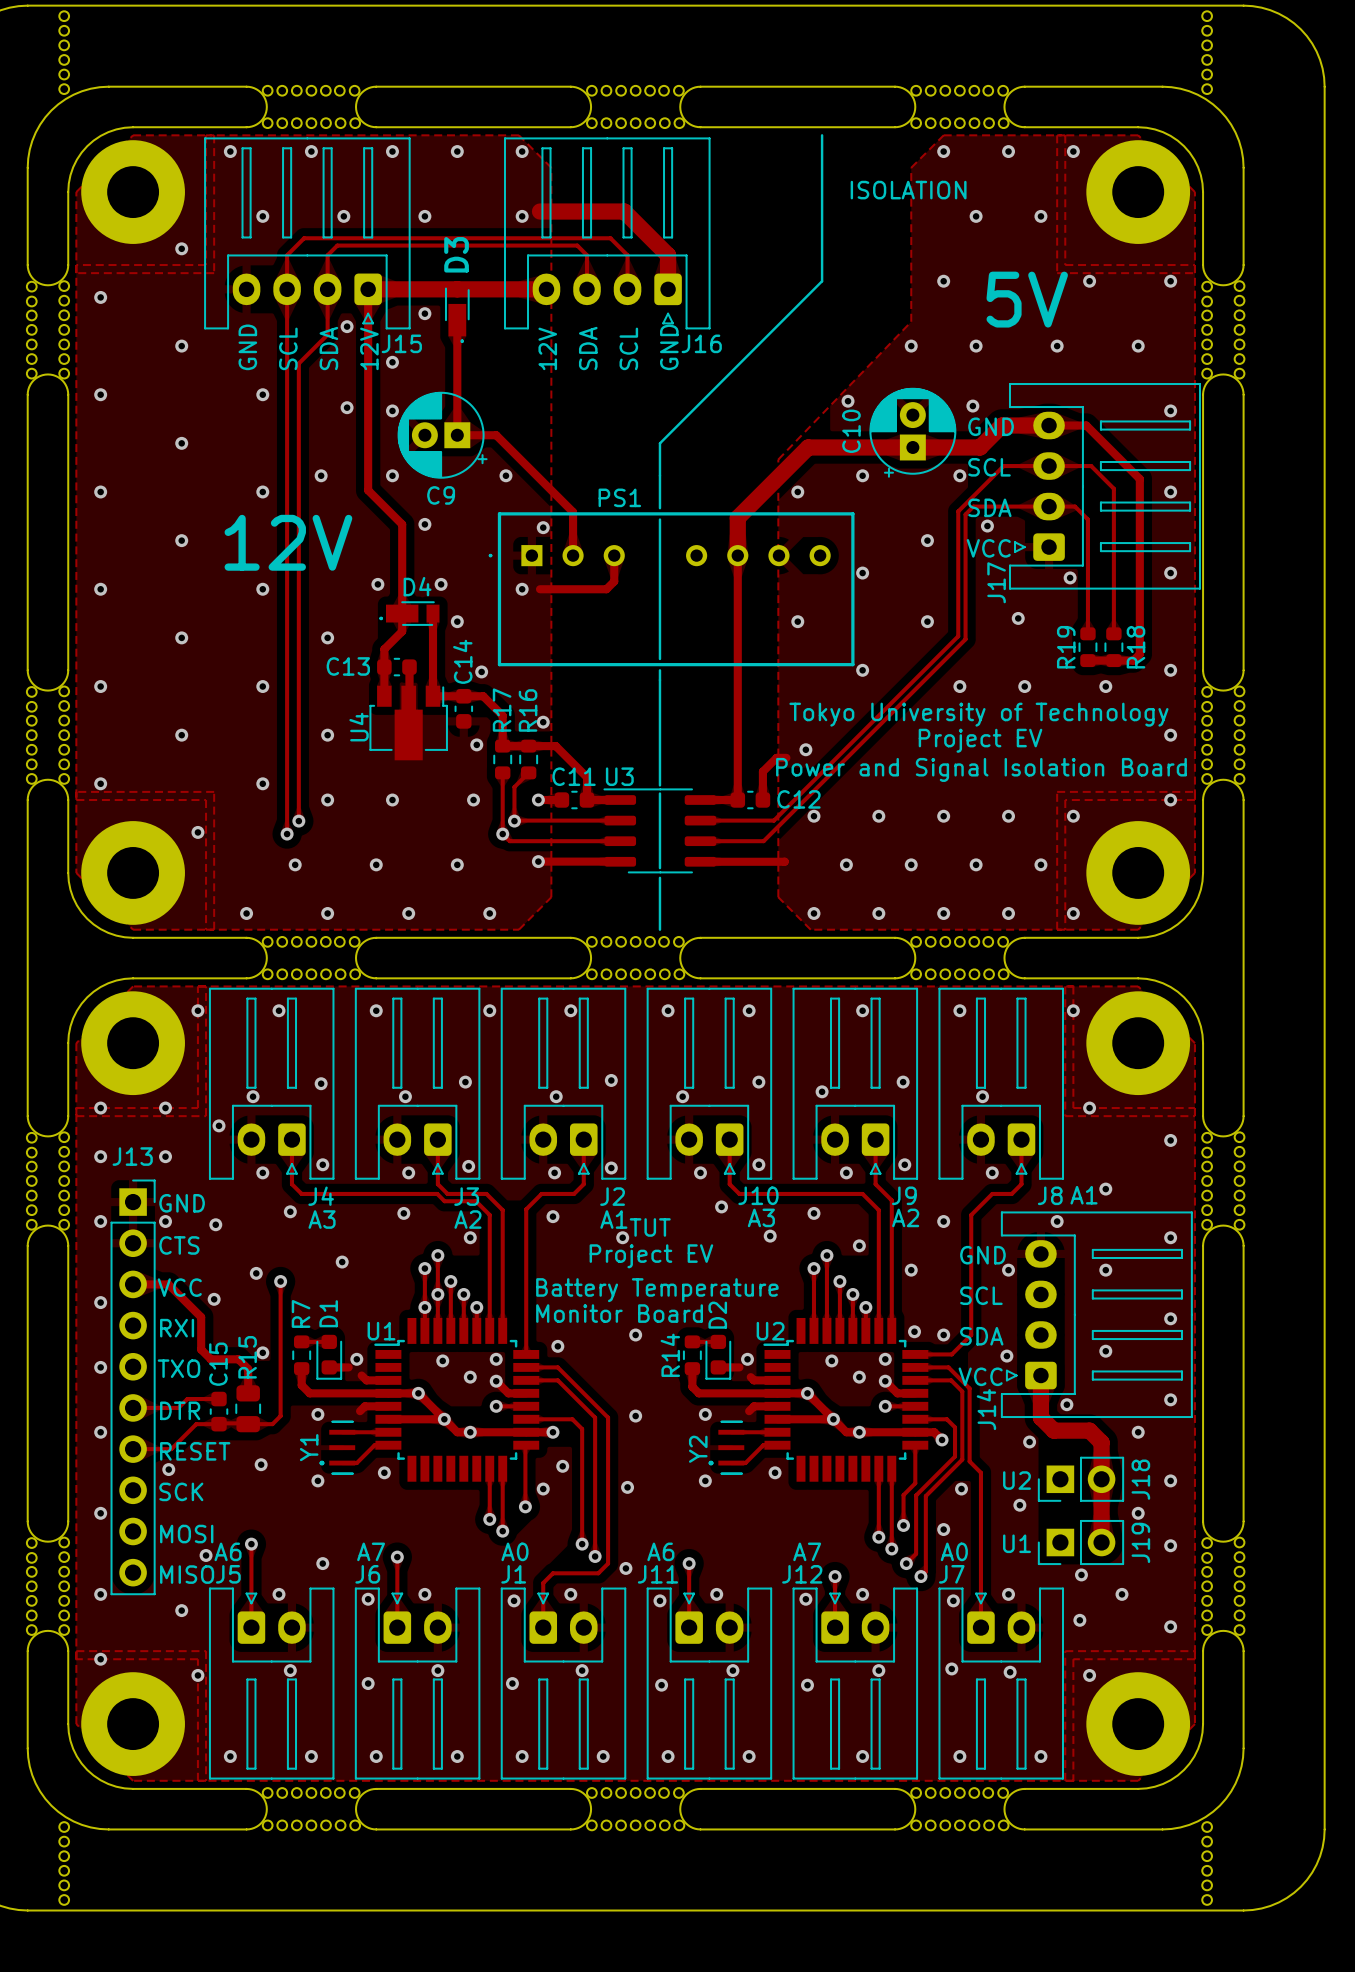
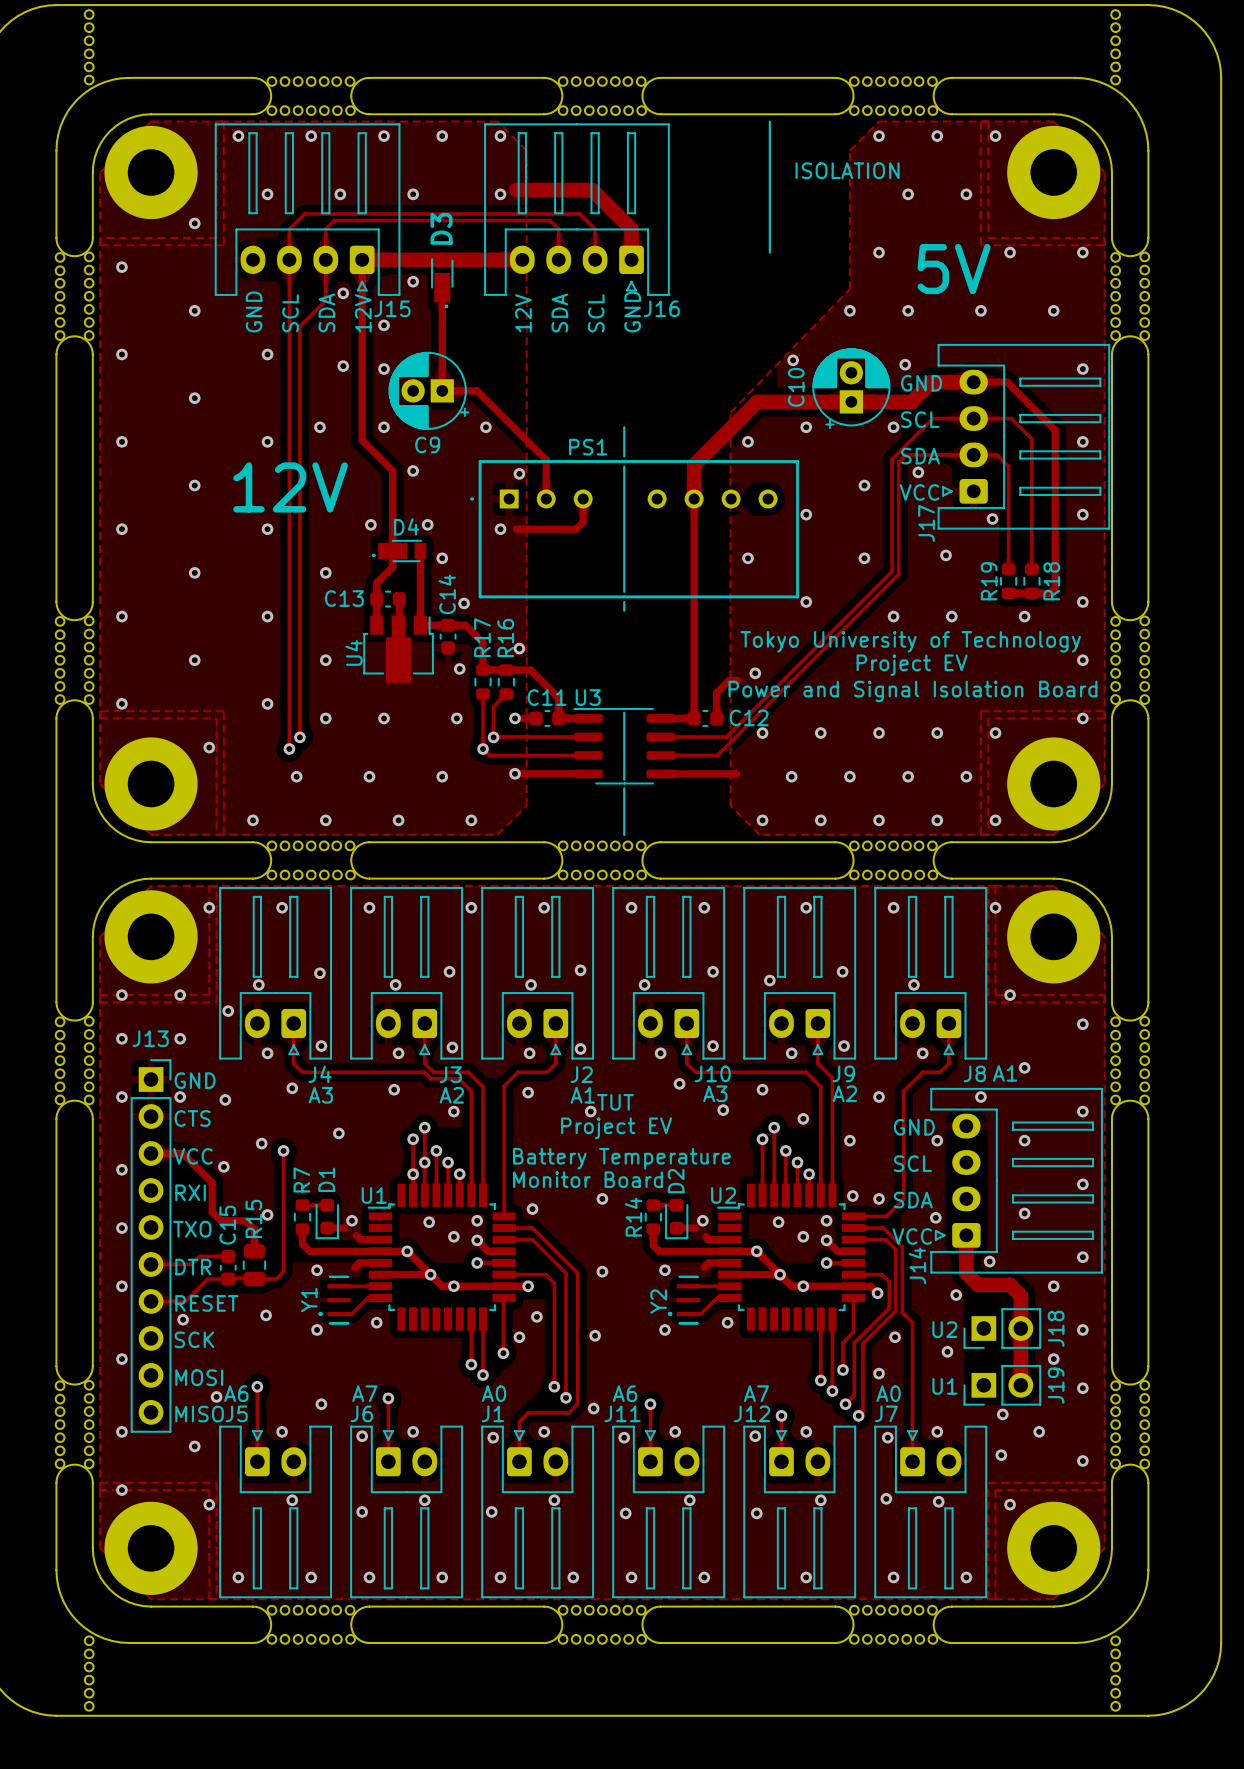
line: (822, 281) (659, 443) (659, 475) -> none
line: (659, 680) (659, 785) -> none

